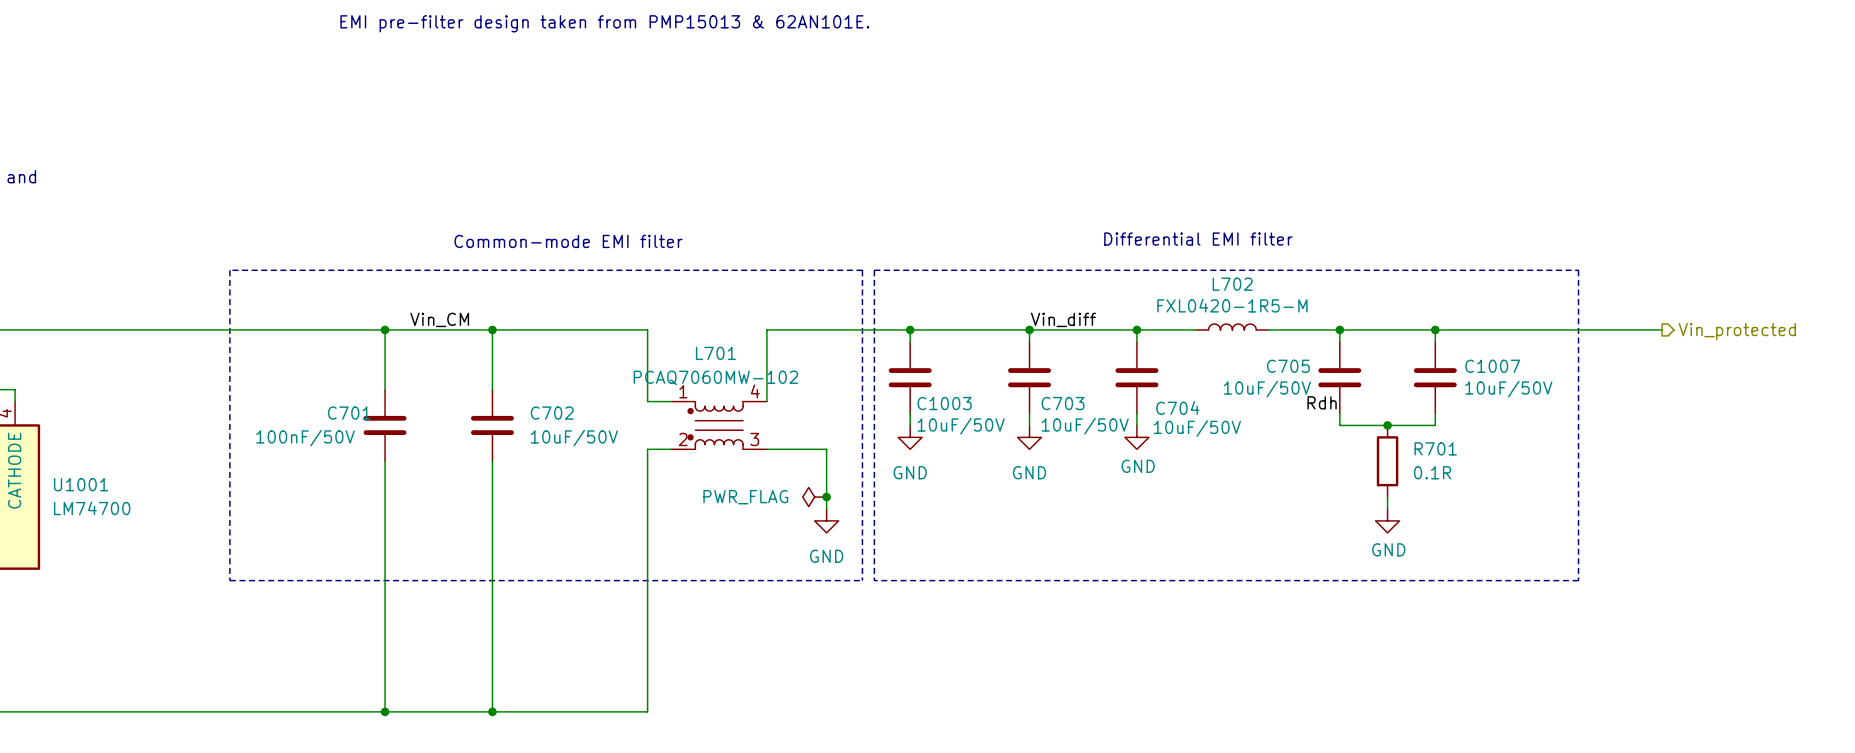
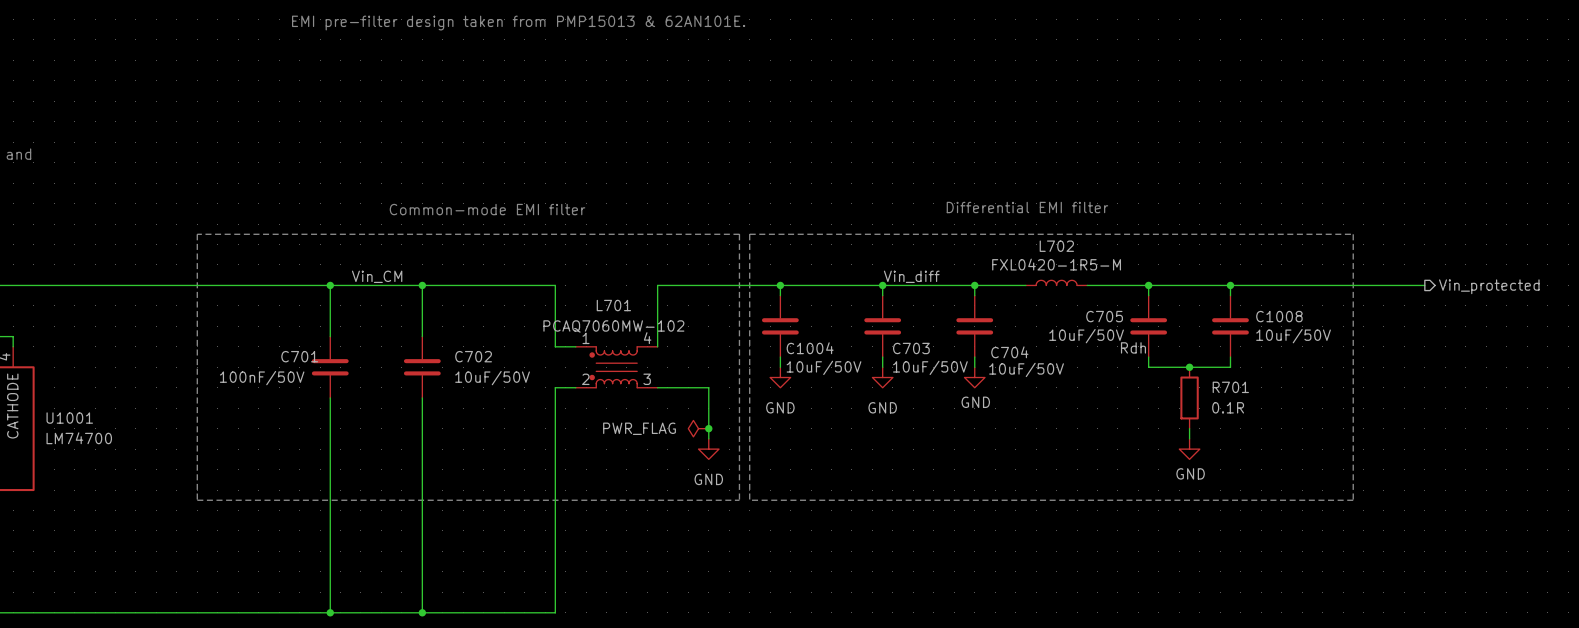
C1007 name: C1007 (1492, 366) -> C1008 (1279, 316)
C1003 name: C1003 (944, 403) -> C1004 (810, 348)

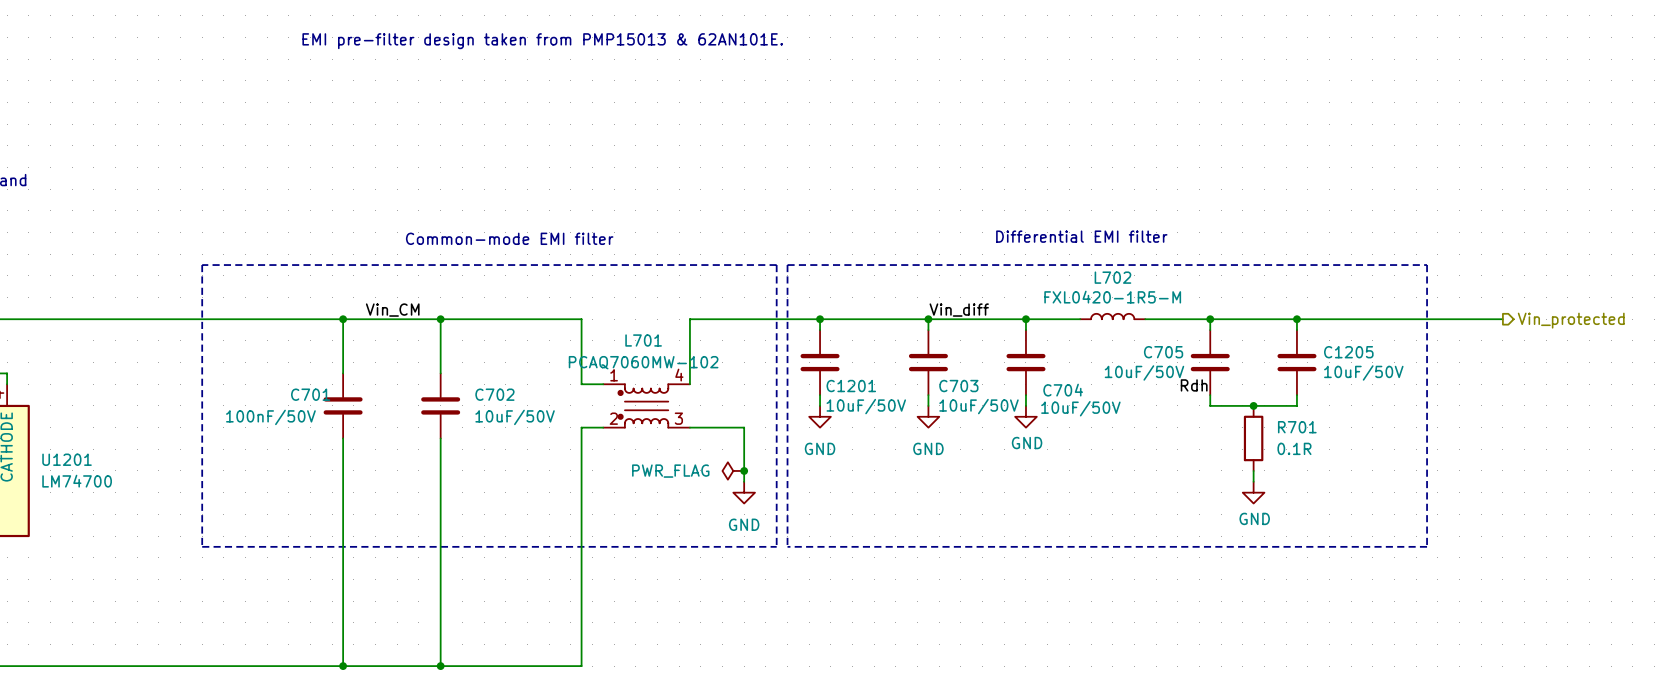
C1008 name: C1008 (1279, 316) -> C1205 (1348, 352)
C1004 name: C1004 (810, 348) -> C1201 (851, 386)
U1001 name: U1001 (69, 418) -> U1201 (67, 459)

